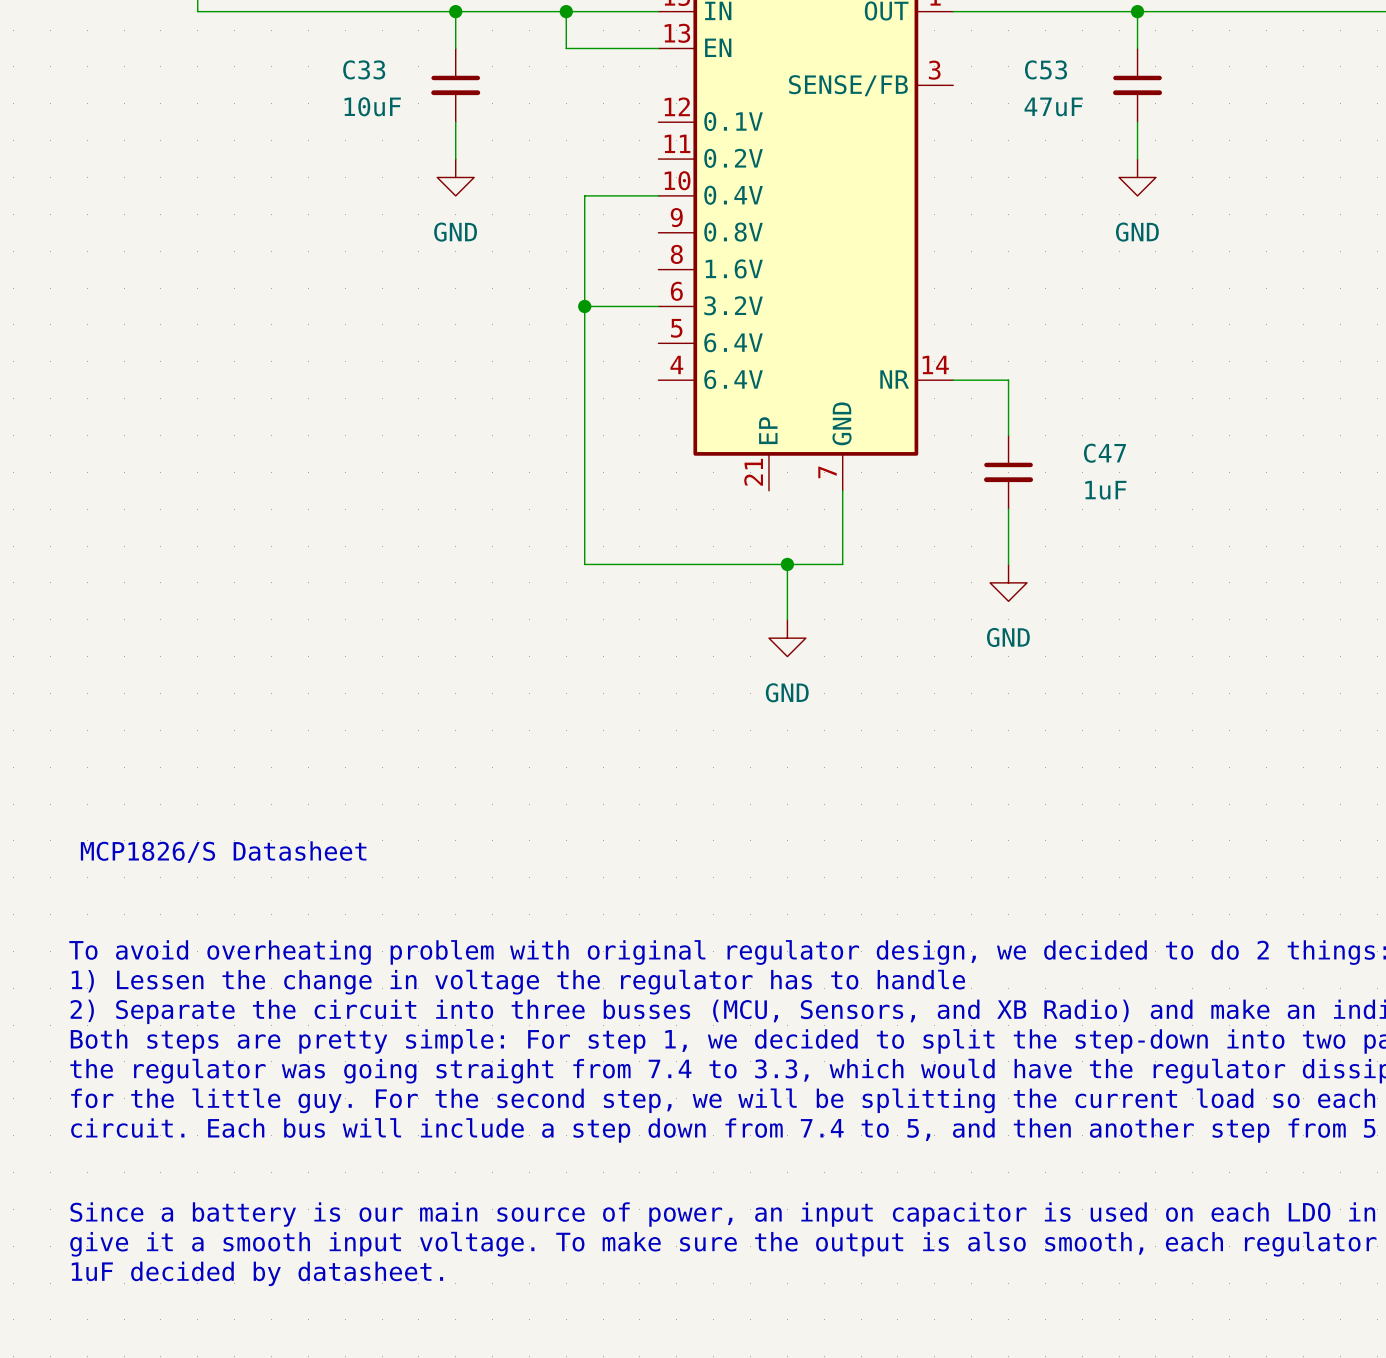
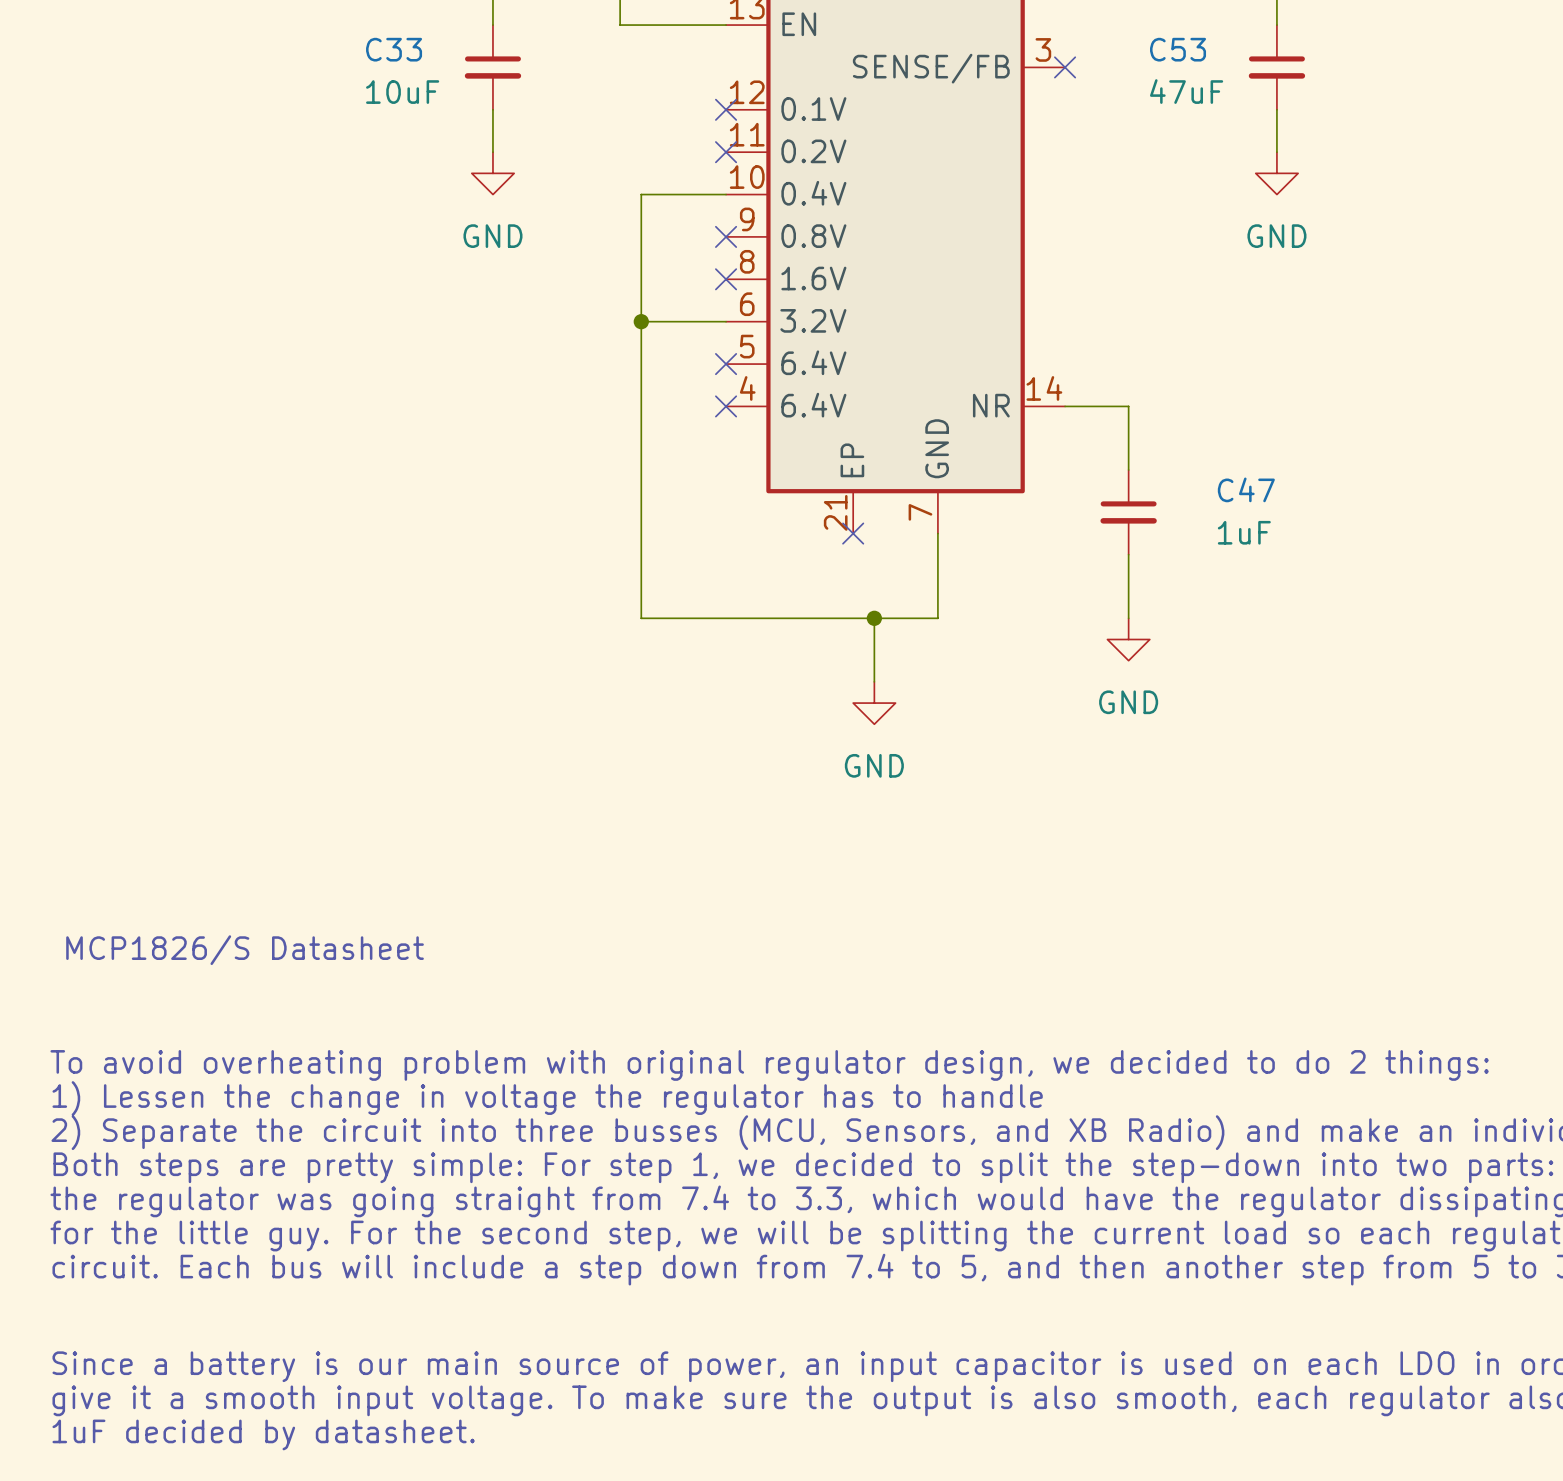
no-connect mark: none -> (1065, 67)
no-connect mark: none -> (726, 109)
no-connect mark: none -> (726, 152)
no-connect mark: none -> (726, 236)
no-connect mark: none -> (726, 279)
no-connect mark: none -> (726, 364)
no-connect mark: none -> (726, 406)
no-connect mark: none -> (853, 533)

